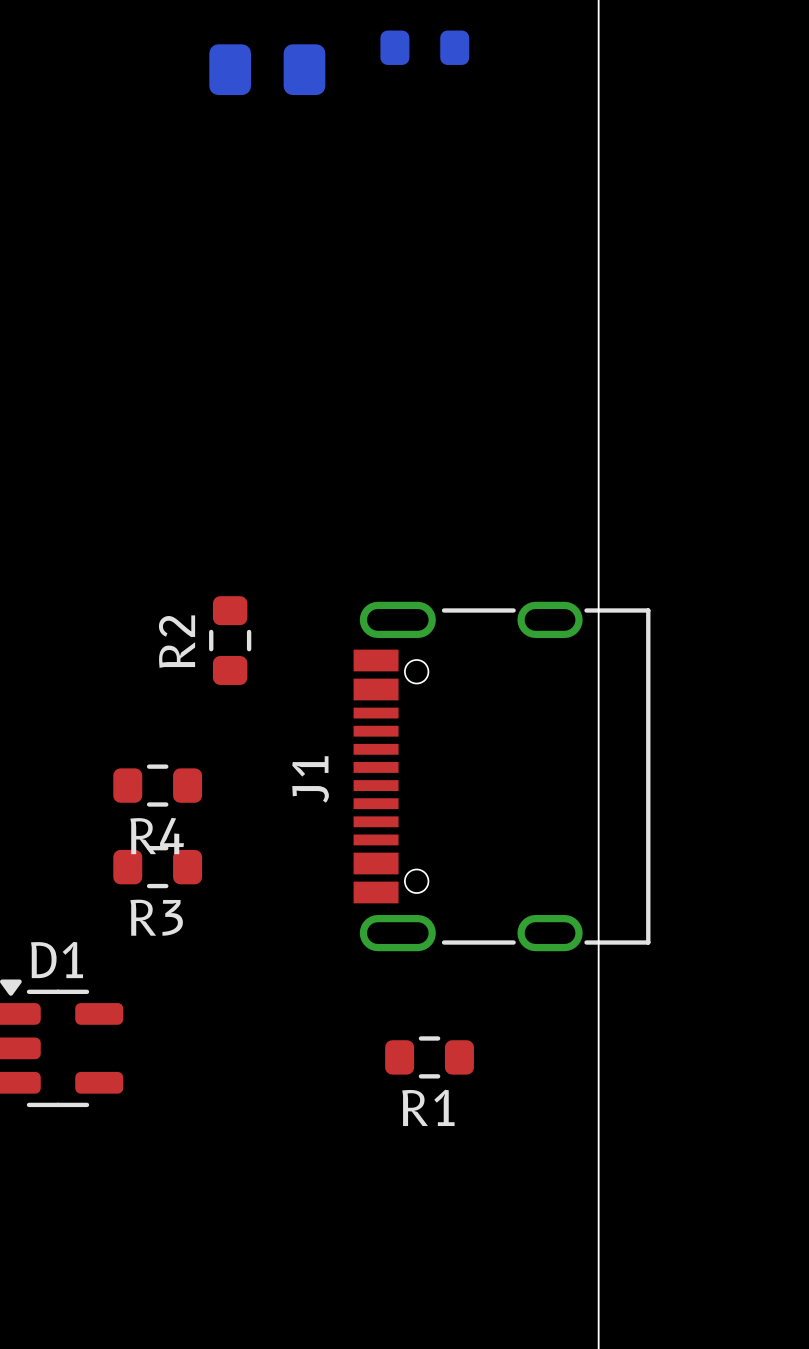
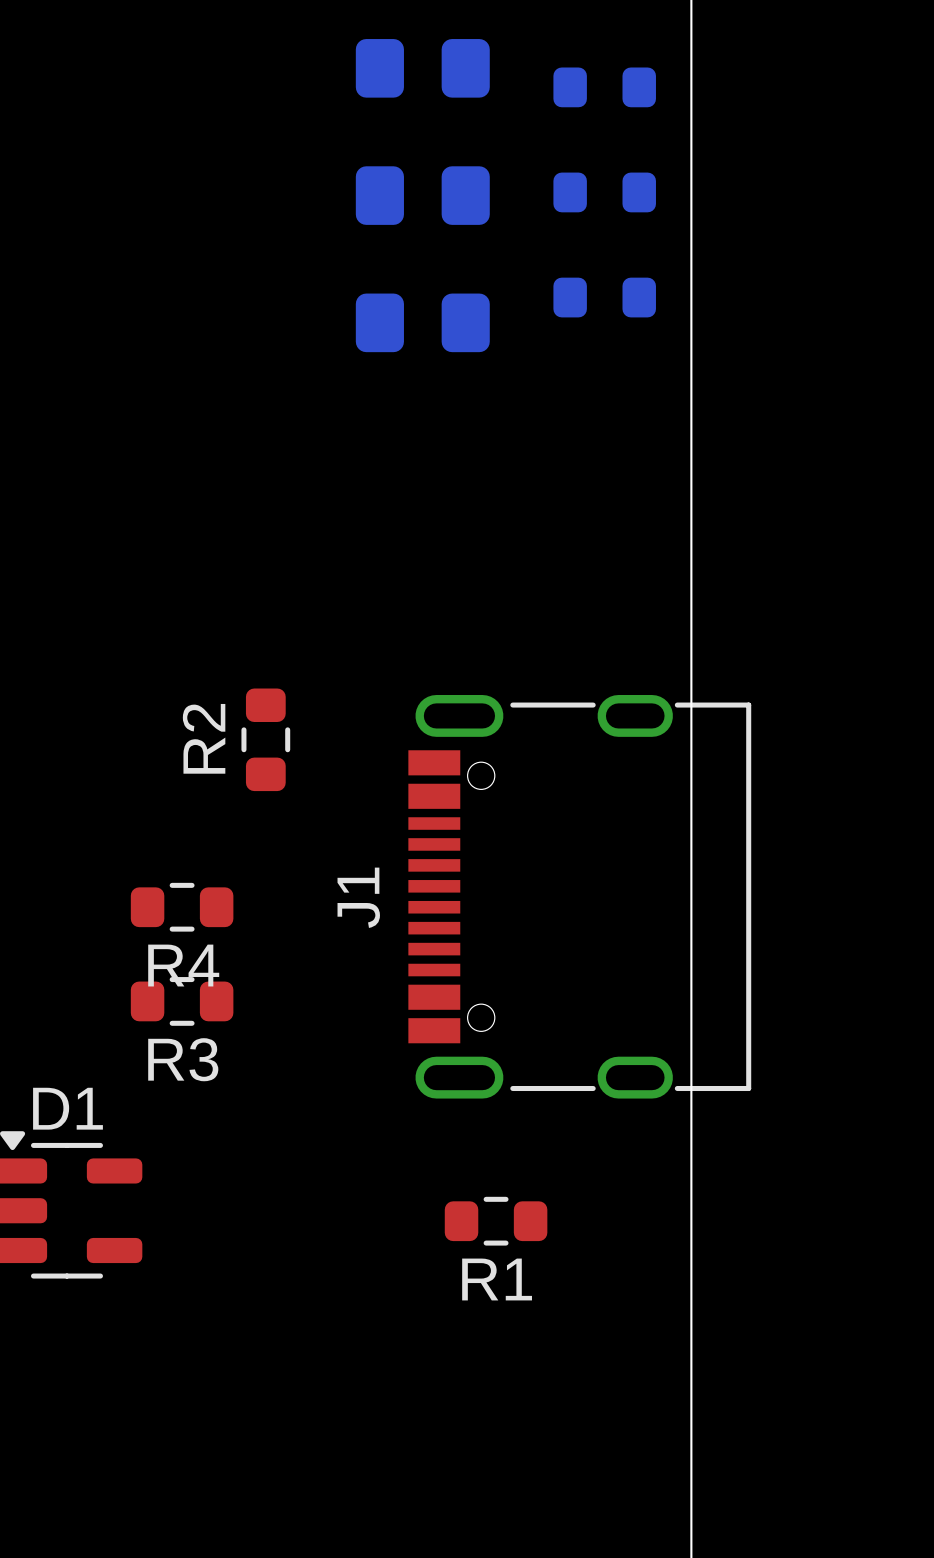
part: (424, 47) -> none
part: none -> (422, 68)
part: (267, 69) -> none
part: none -> (604, 87)
part: none -> (604, 192)
part: none -> (422, 195)
part: none -> (604, 297)
part: none -> (422, 322)

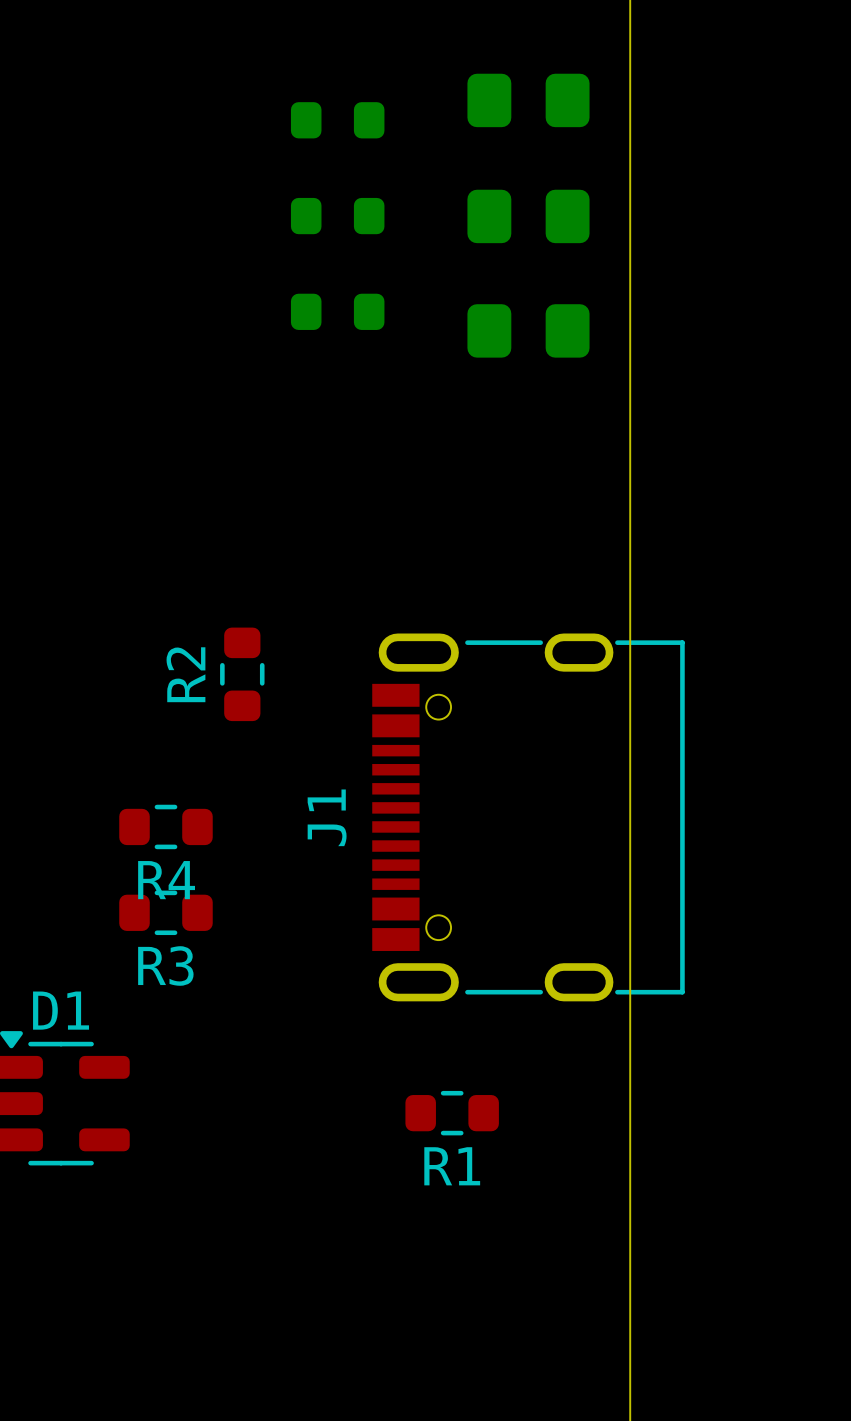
part footprint: [553, 67, 656, 108] -> [467, 73, 590, 128]
part: (422, 68) -> none
part: none -> (337, 120)
part: (604, 192) -> none
part: (422, 195) -> none
part: none -> (337, 216)
part: none -> (528, 216)
part: (604, 297) -> none
part: (422, 322) -> none
part: none -> (337, 311)
part: none -> (528, 330)

